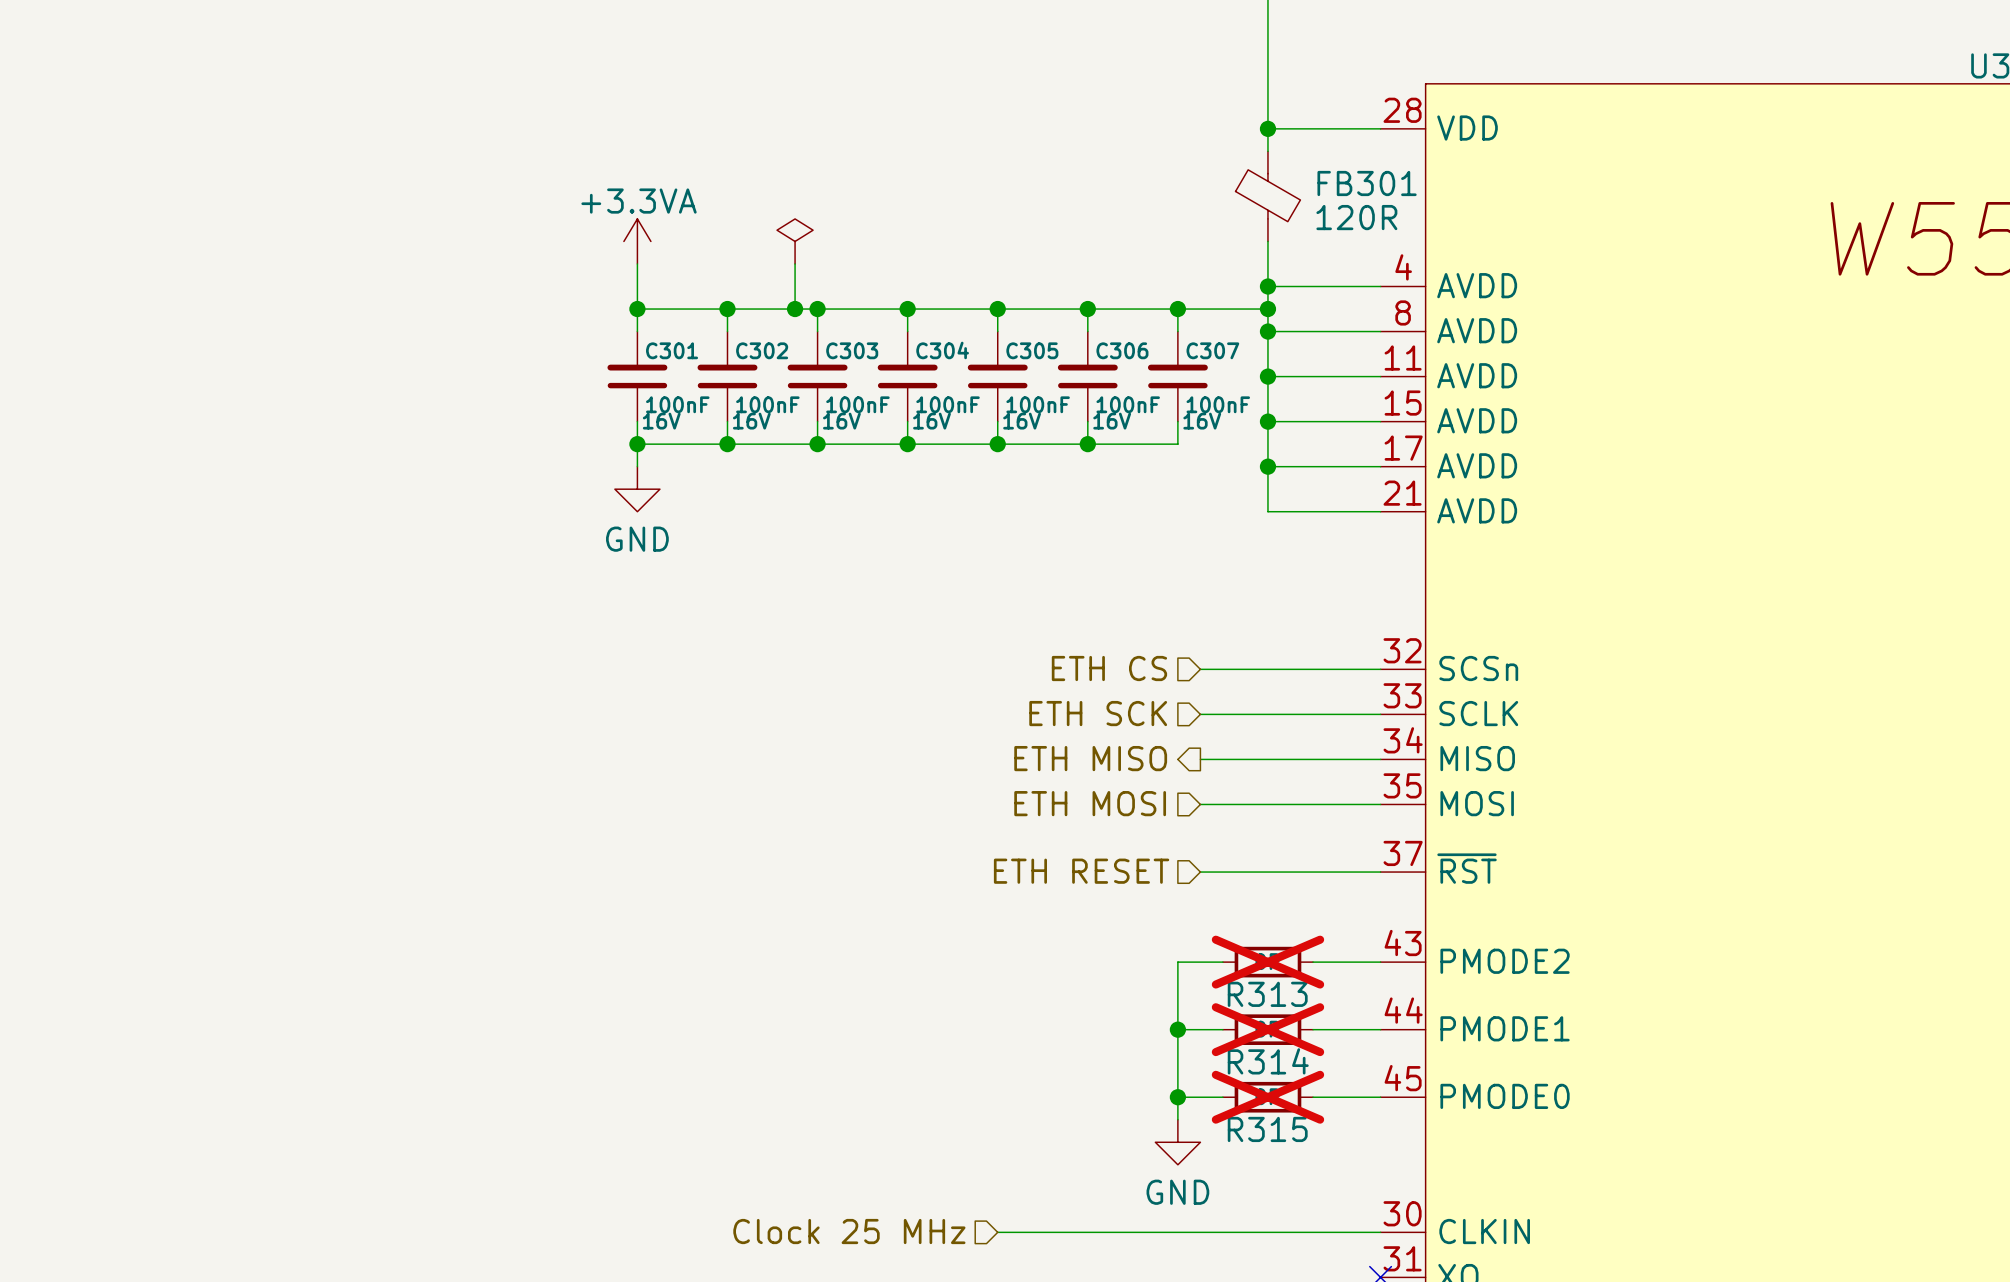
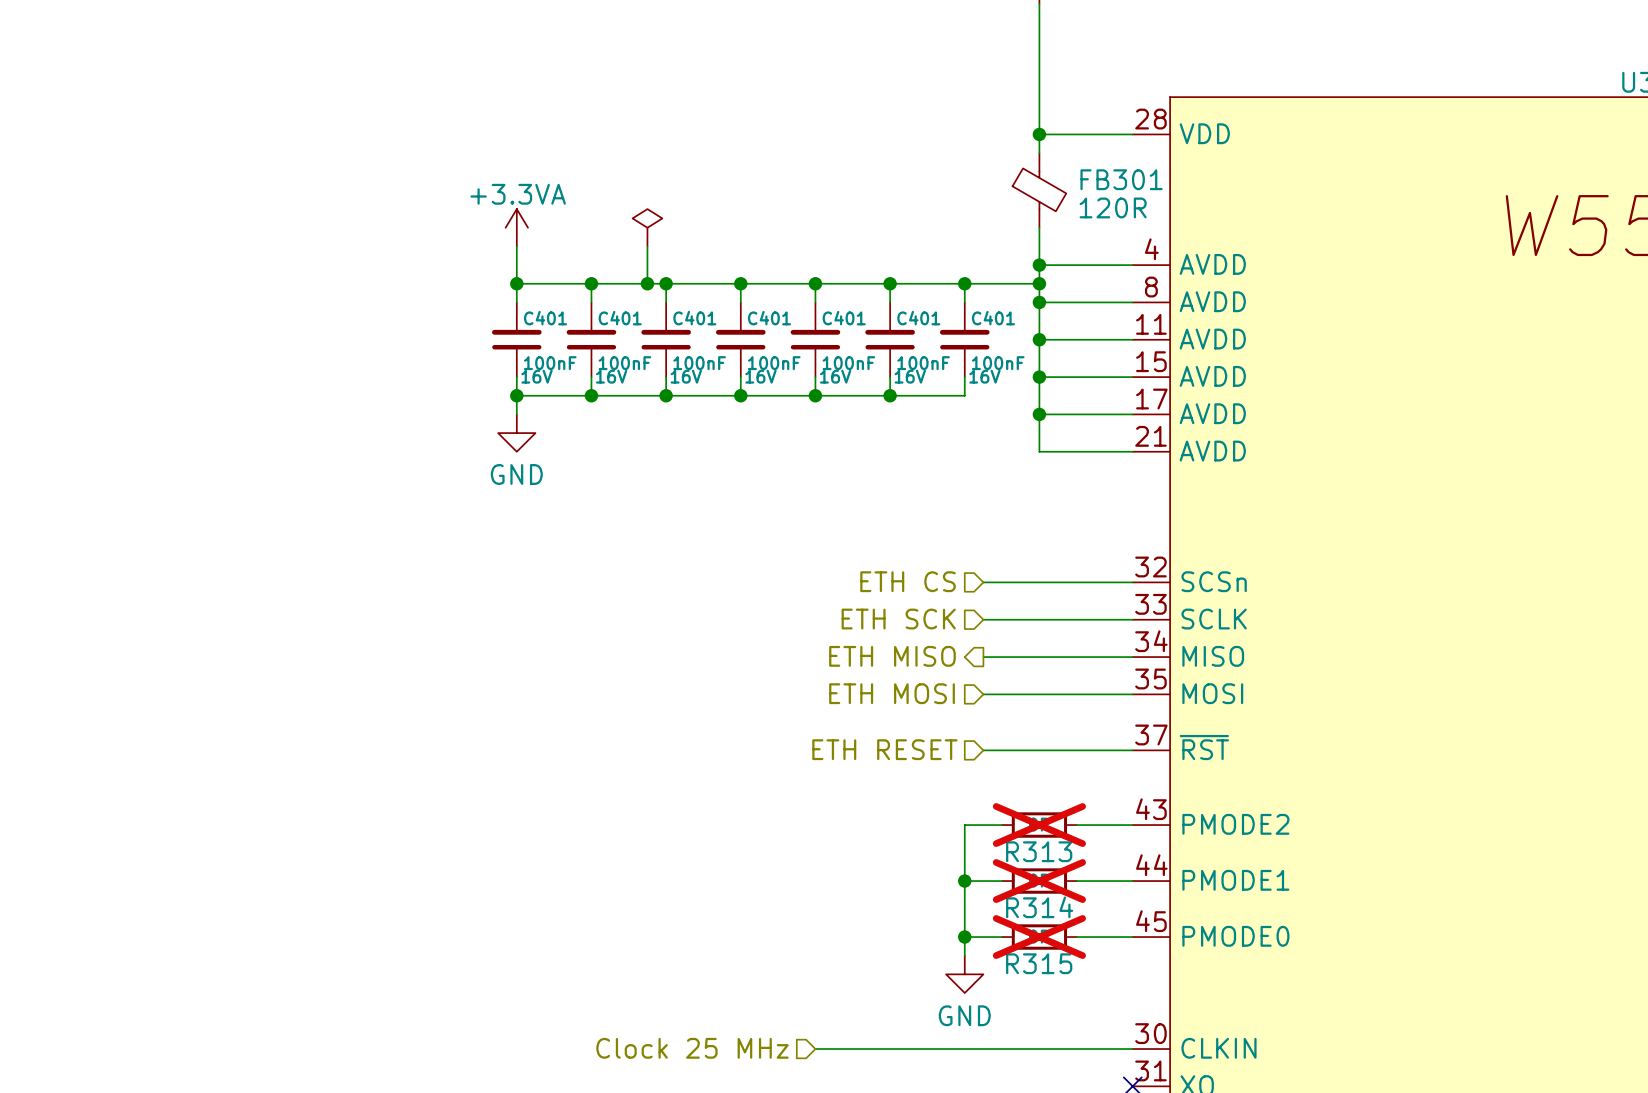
C301 name: C301 (672, 350) -> C401 (545, 318)
C302 name: C302 (762, 350) -> C401 (620, 318)
C303 name: C303 (852, 350) -> C401 (694, 318)
C304 name: C304 (942, 350) -> C401 (769, 318)
C305 name: C305 (1032, 350) -> C401 (844, 318)
C306 name: C306 (1122, 350) -> C401 (918, 318)
C307 name: C307 (1212, 350) -> C401 (993, 318)

